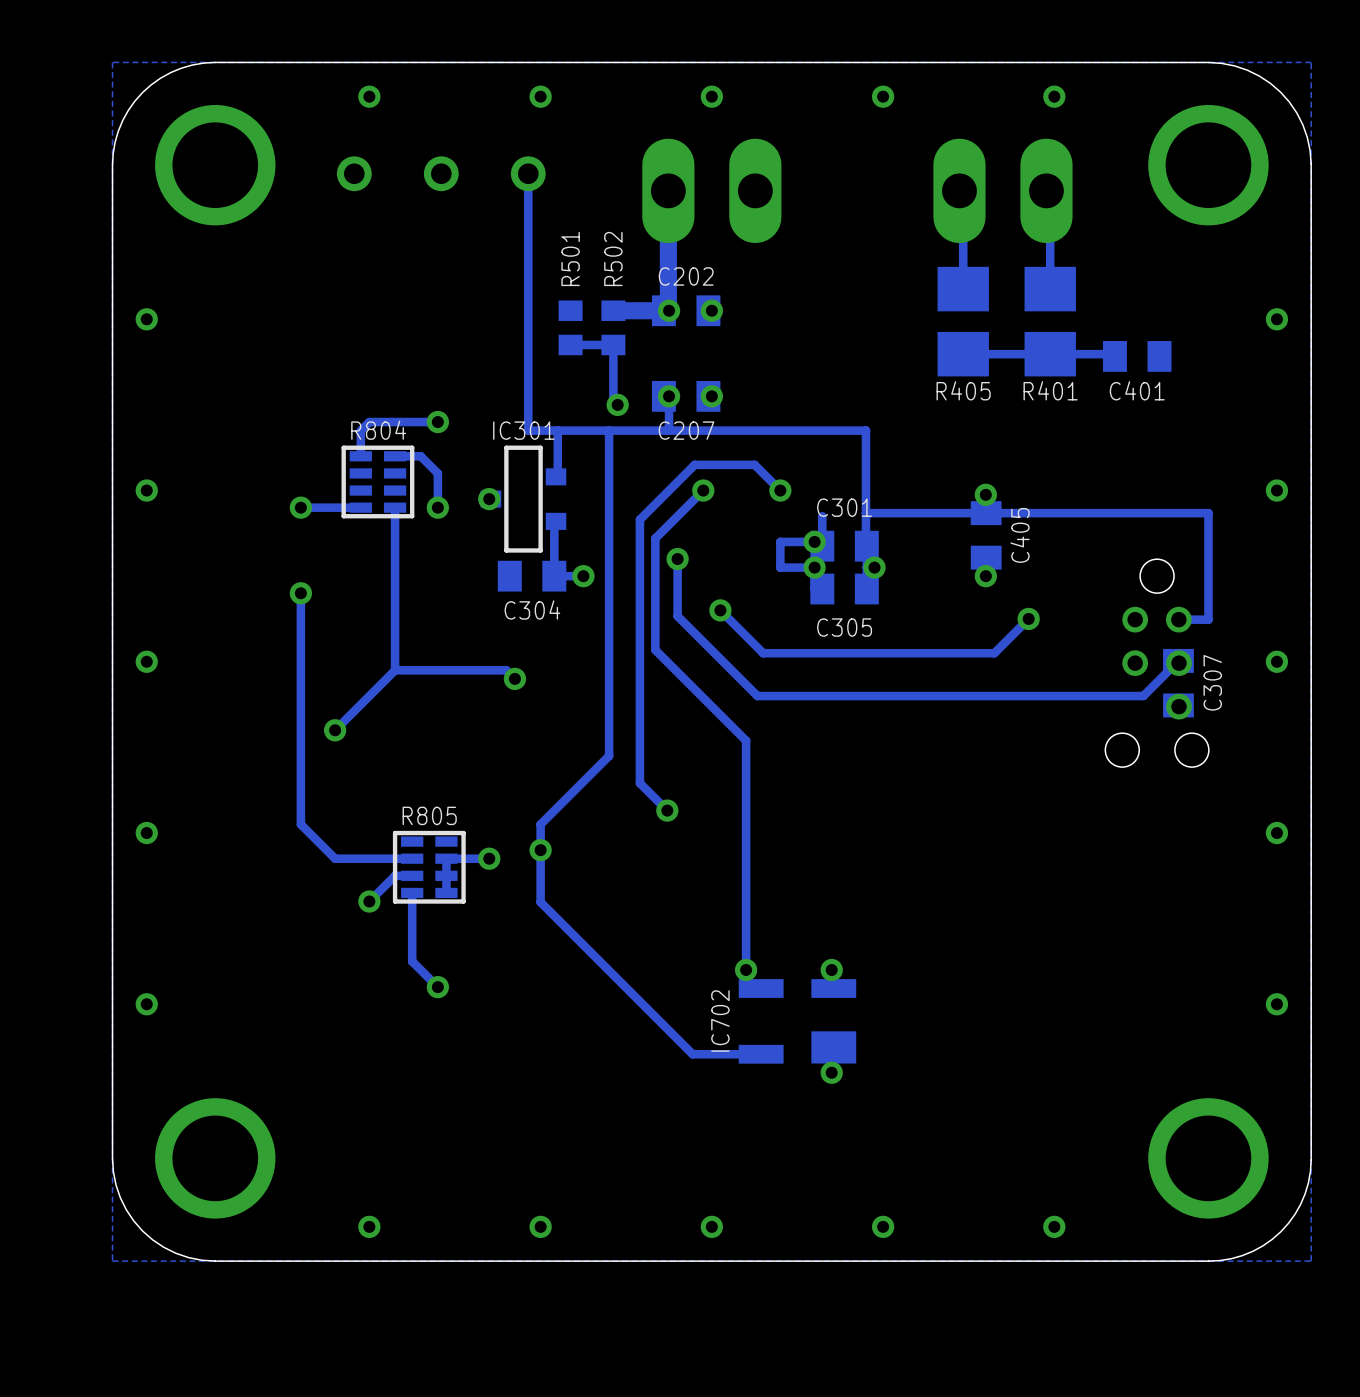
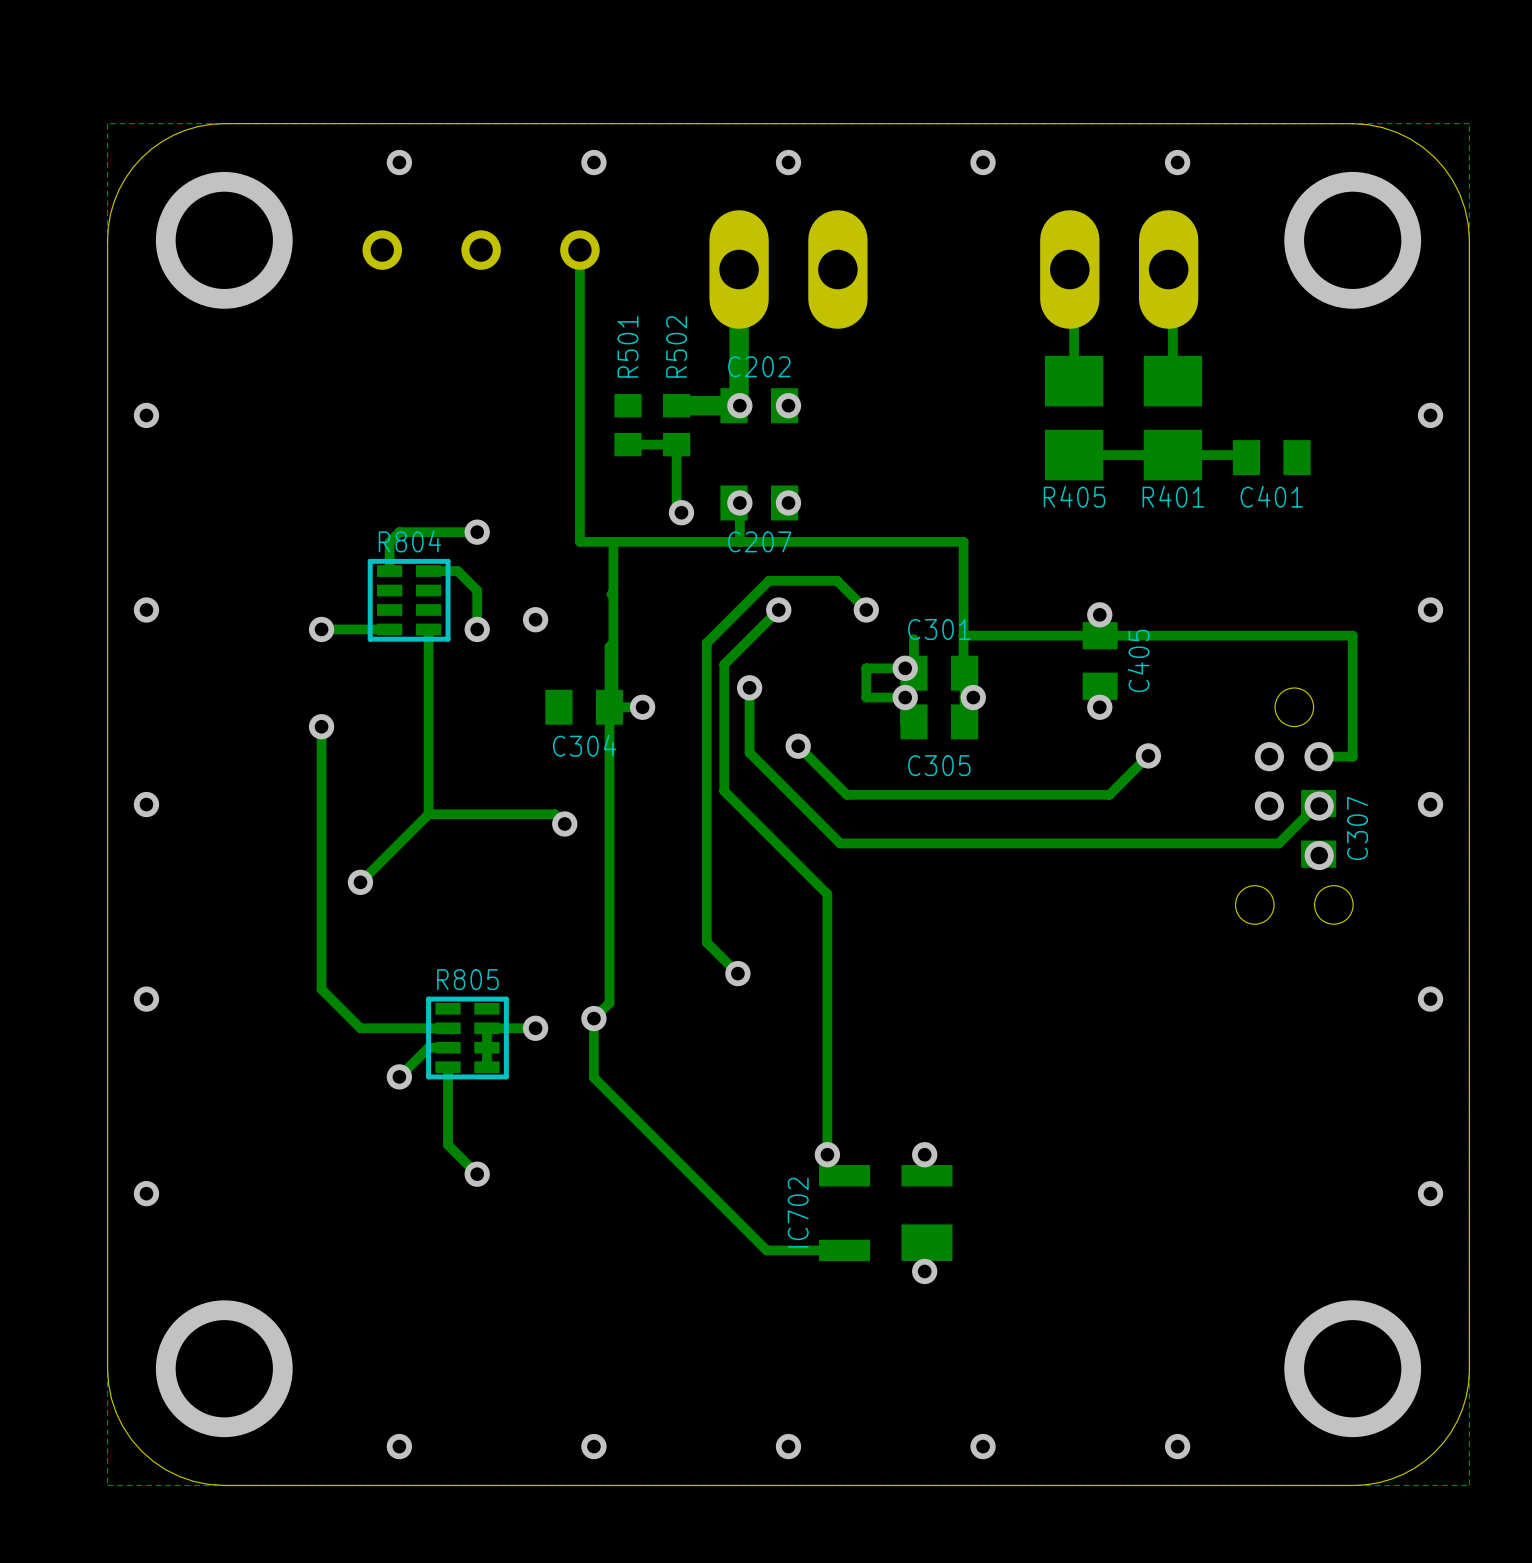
track: (609, 430) (609, 755) (540, 824) (540, 850) -> (613, 592) (613, 703) (609, 707) (609, 1002) (593, 1018)
IC301: (523, 499) -> none

